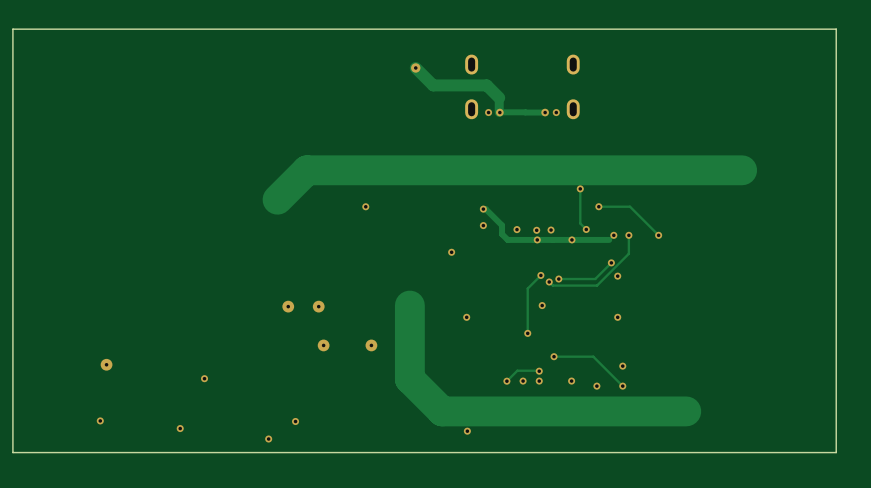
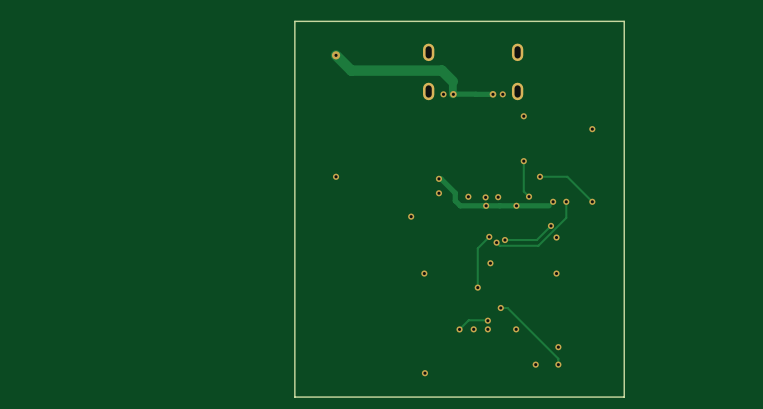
board edge: (695, 29) (836, 29) (836, 452) (12, 452) (12, 29) (318, 29) -> (624, 21) (624, 397) (294, 397) (294, 21)
track: (415, 67) (433, 85) -> (336, 55) (351, 70) (395, 70)
via position: (415, 67) -> (336, 55)
via: none -> (523, 116)
via: none -> (592, 129)
track: (742, 170) (306, 170) (277, 199) -> none
track: (409, 305) (409, 379) (442, 411) (686, 411) -> none
via: (288, 306) -> none
via: (318, 306) -> none
via: (323, 345) -> none
via: (371, 345) -> none
track: (561, 356) (593, 356) (622, 386) -> (507, 308) (558, 358) (558, 364)
via: (106, 364) -> none
via: (622, 366) -> none
via: (204, 378) -> none
via: (596, 386) -> none
via: (622, 386) -> none
via: none -> (558, 347)
via: (100, 420) -> none
via: (295, 421) -> none
via: none -> (535, 364)
via: none -> (558, 364)
via: (180, 428) -> none
via: (268, 439) -> none

